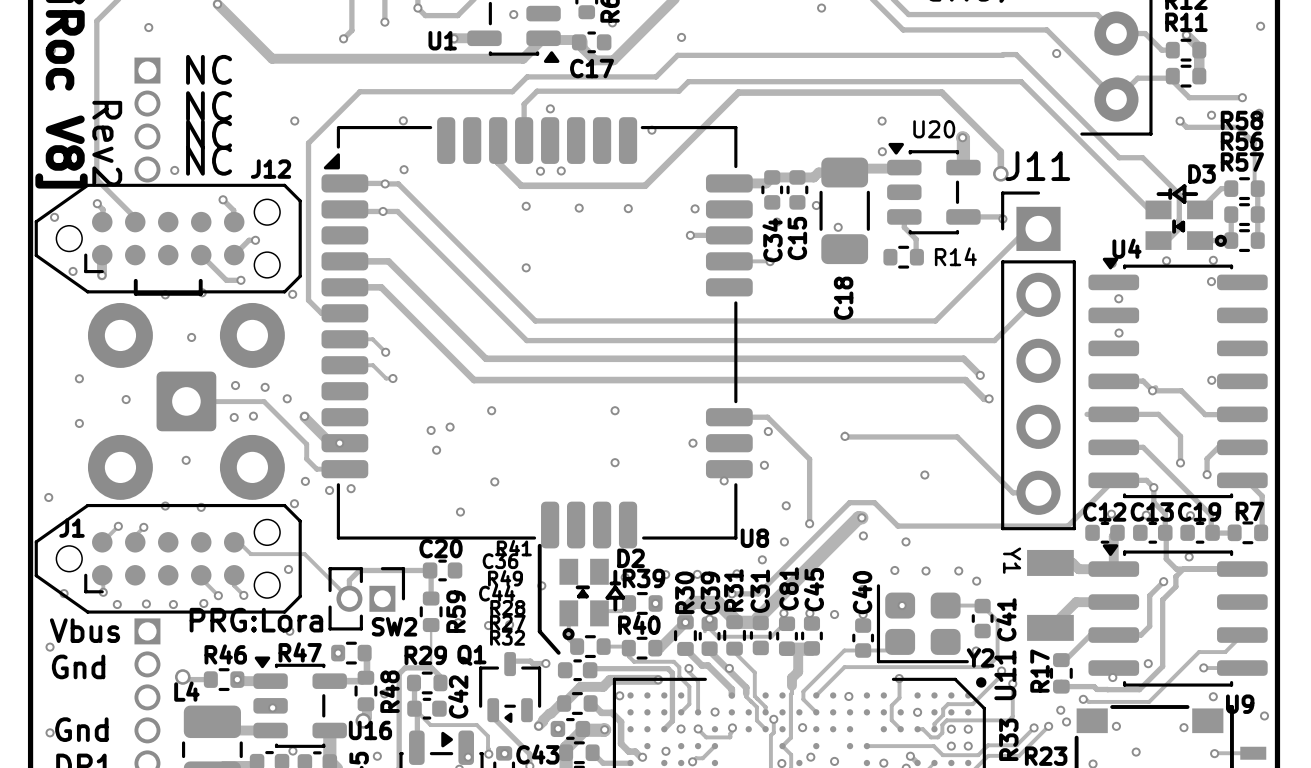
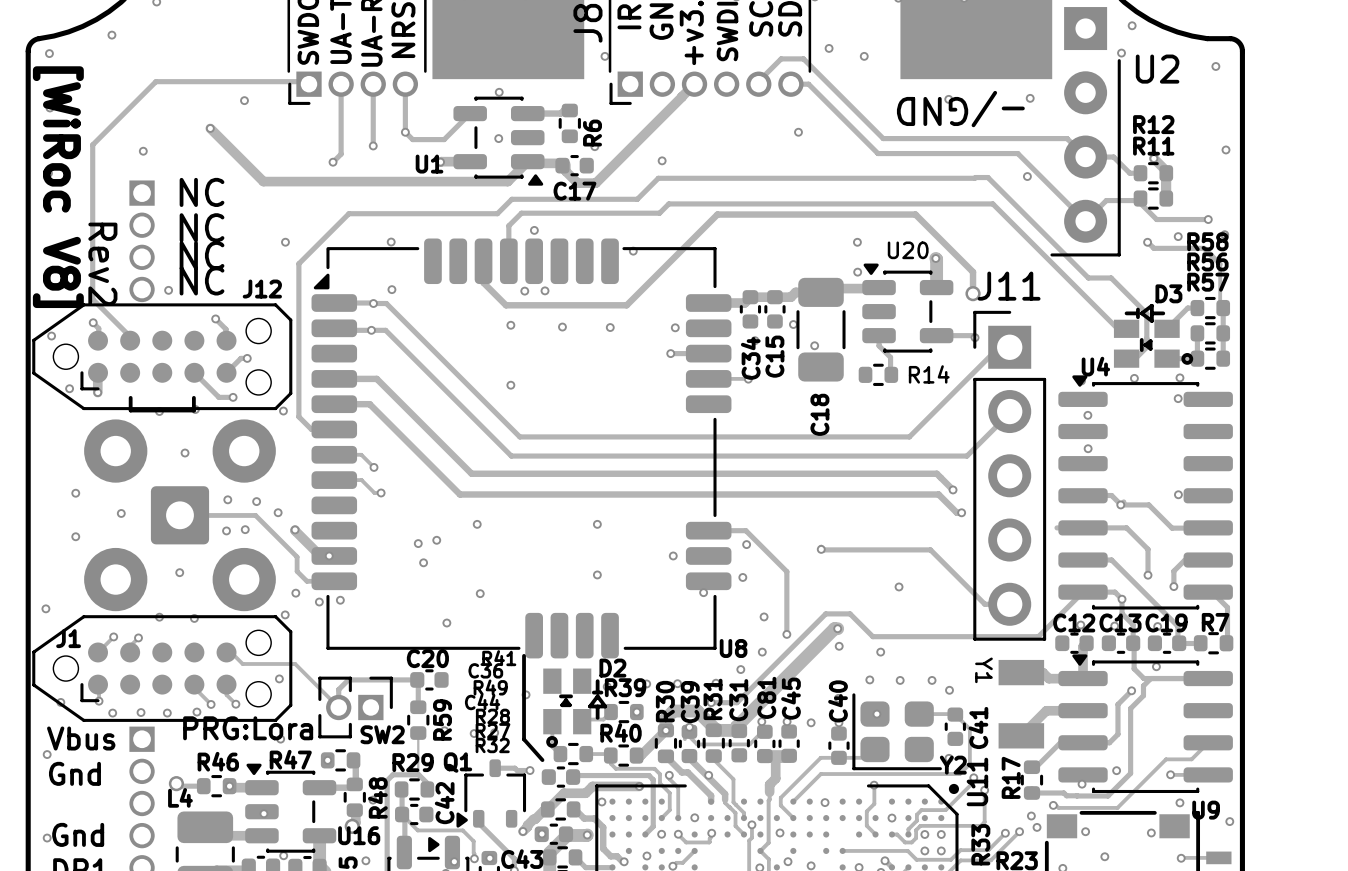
Q1 footprint: [479, 652, 542, 723] -> [456, 759, 527, 828]

